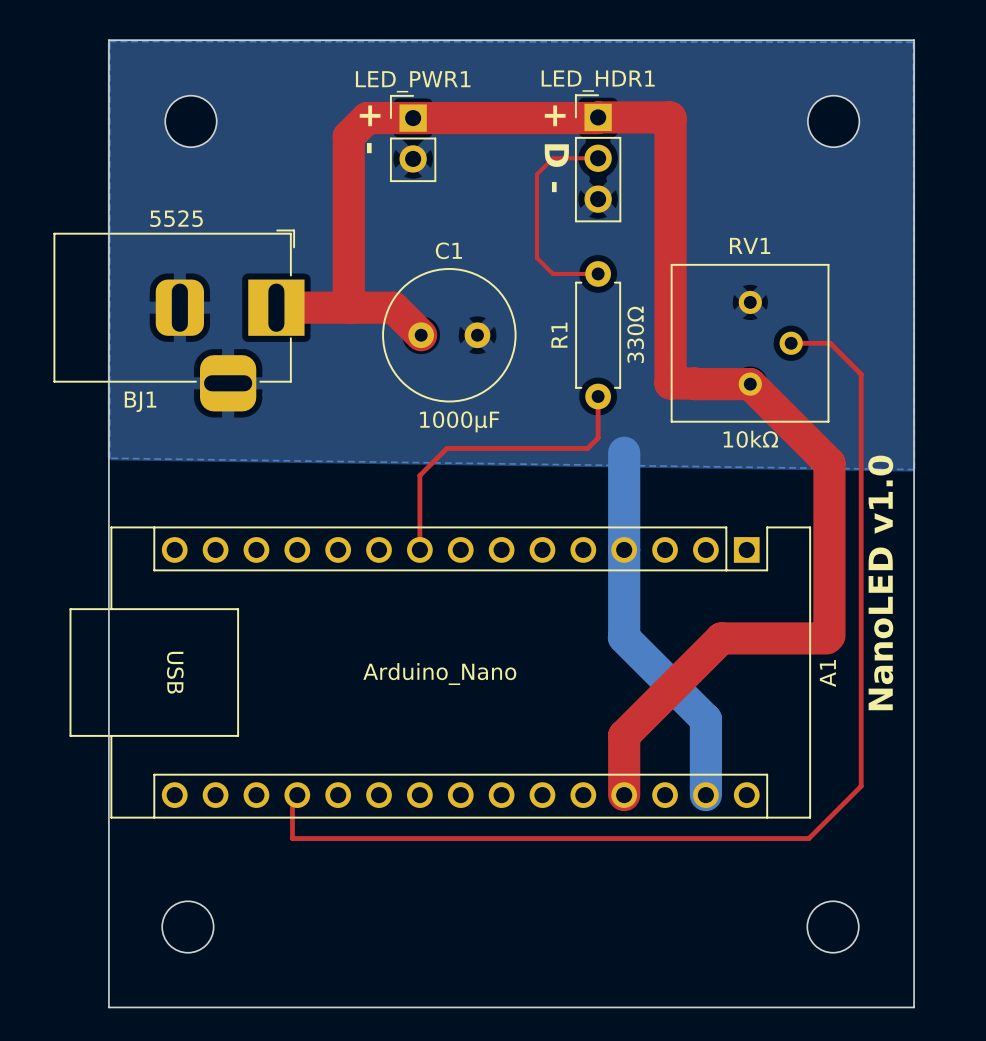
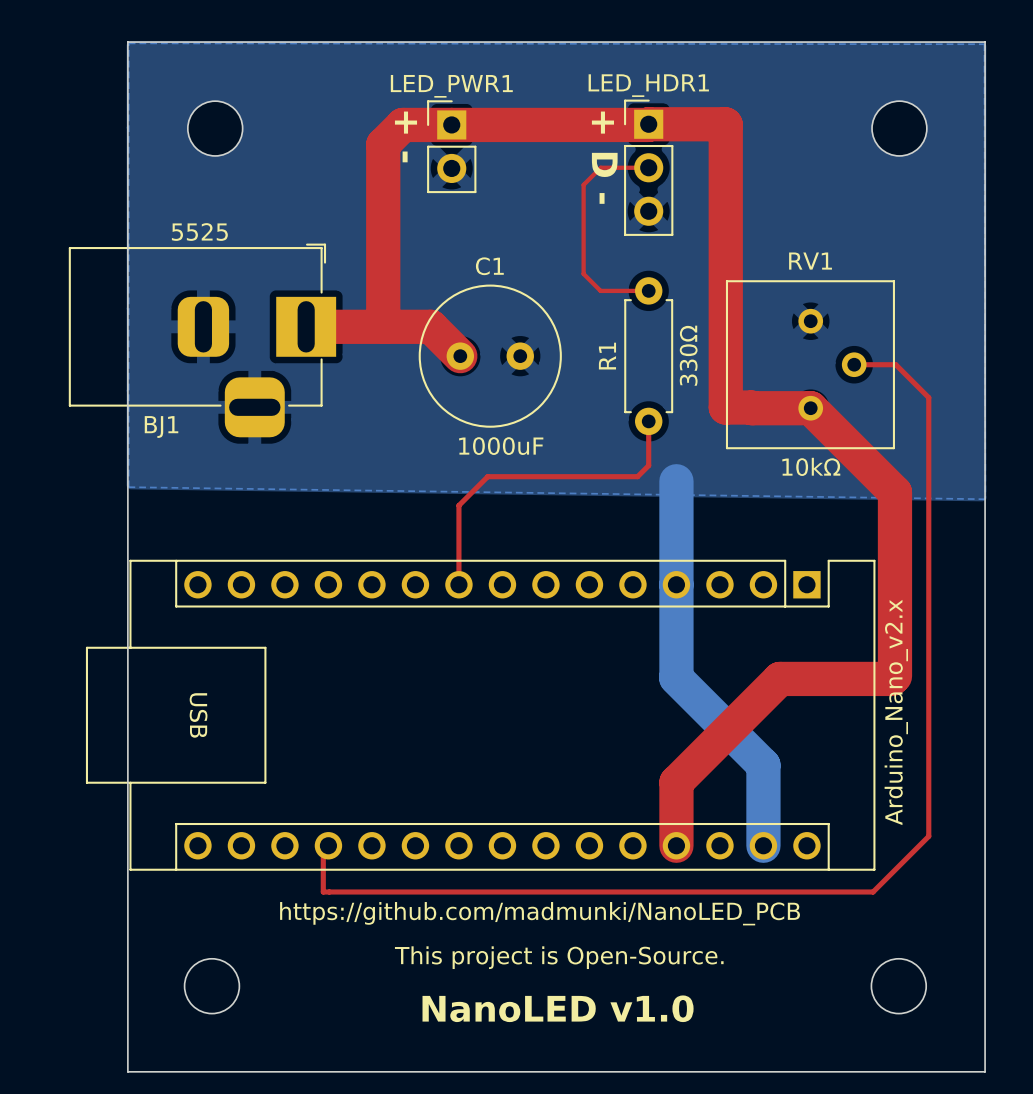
C1 value: 1000µF (459, 421) -> 1000uF (501, 446)
text: NanoLED v1.0 (880, 582) -> none
A1 name: A1 (827, 673) -> none
A1 value: Arduino_Nano (439, 674) -> Arduino_Nano_v2.x (896, 712)
text: none -> https://github.com/madmunki/NanoLED_PCB (540, 913)
text: none -> This project is Open-Source. (559, 957)
text: none -> NanoLED v1.0 (558, 1008)

